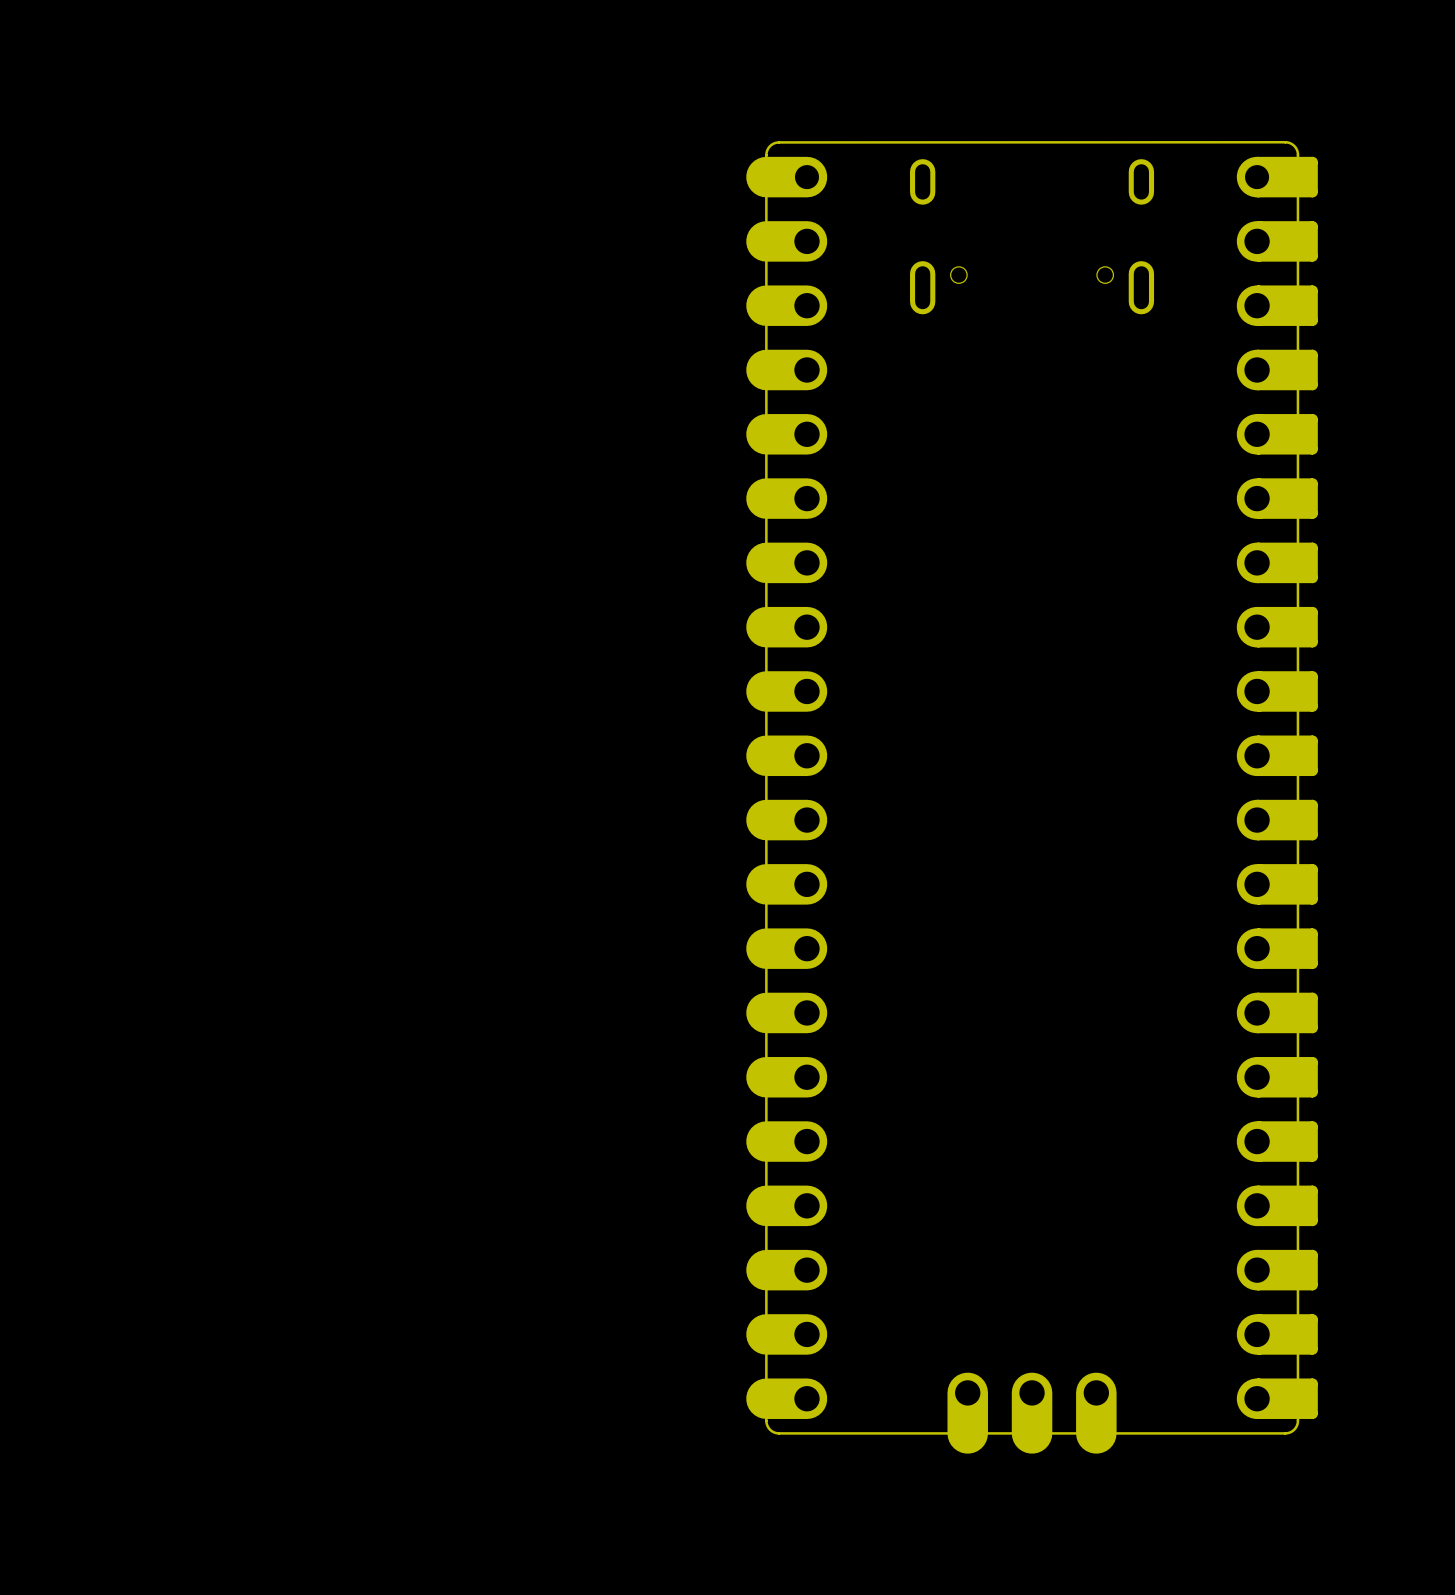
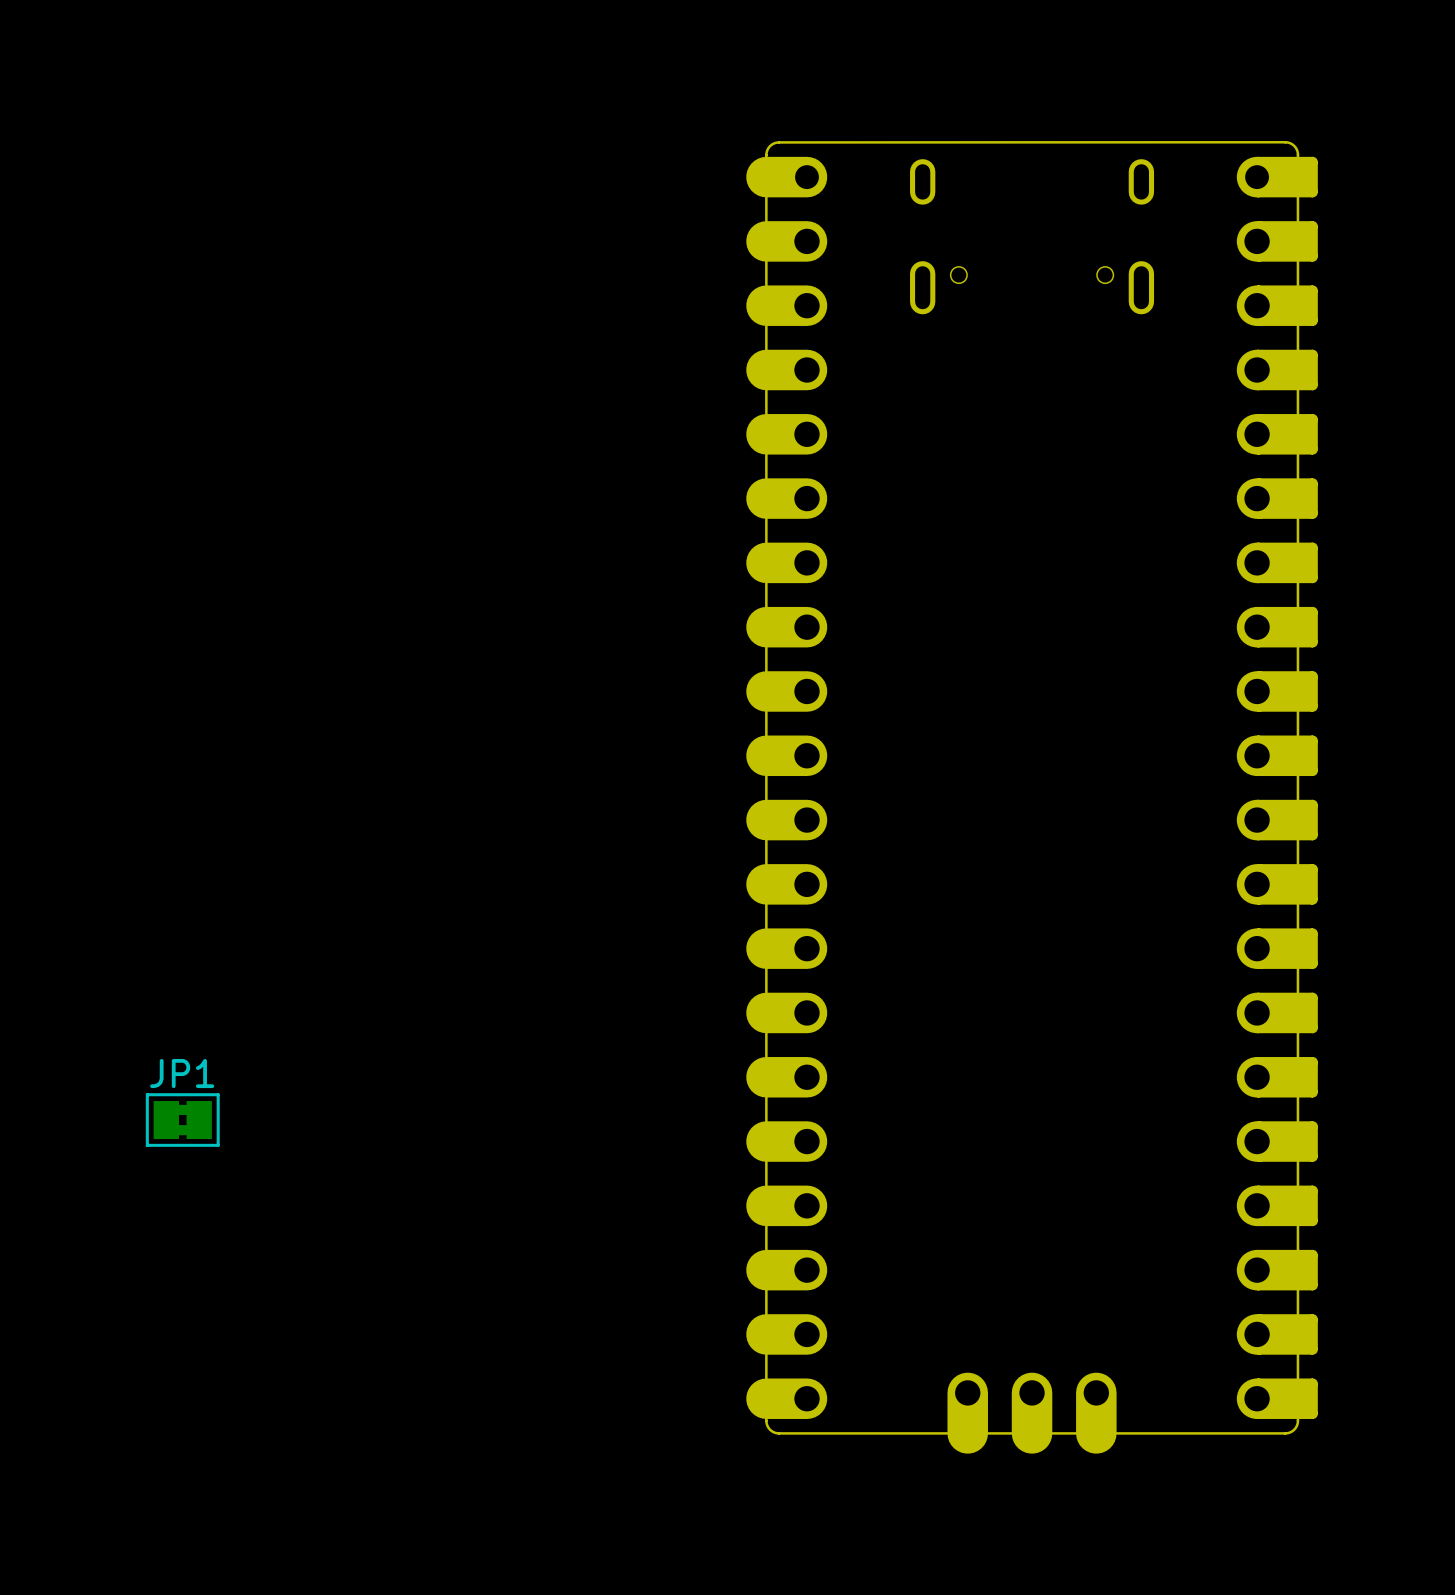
JP1: none -> (182, 1120)

